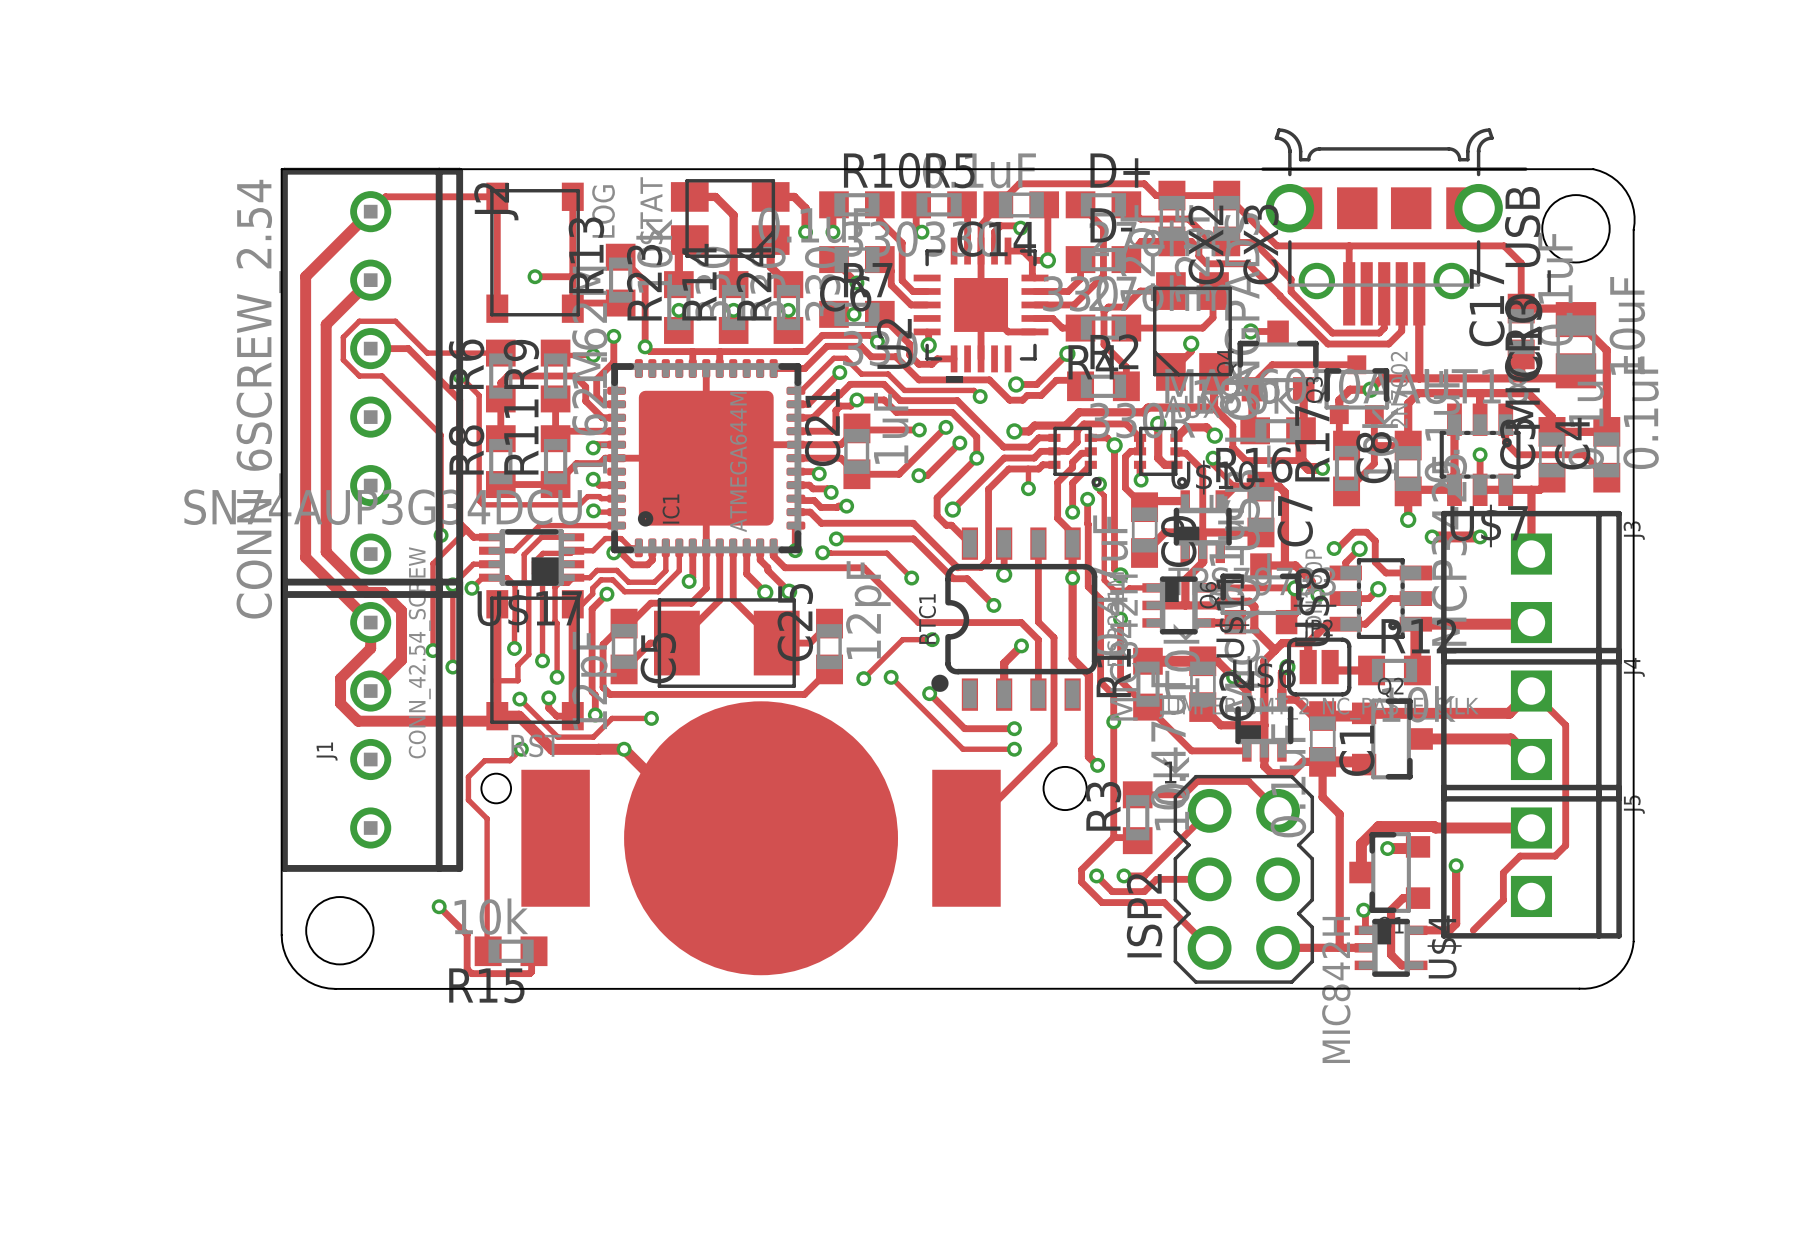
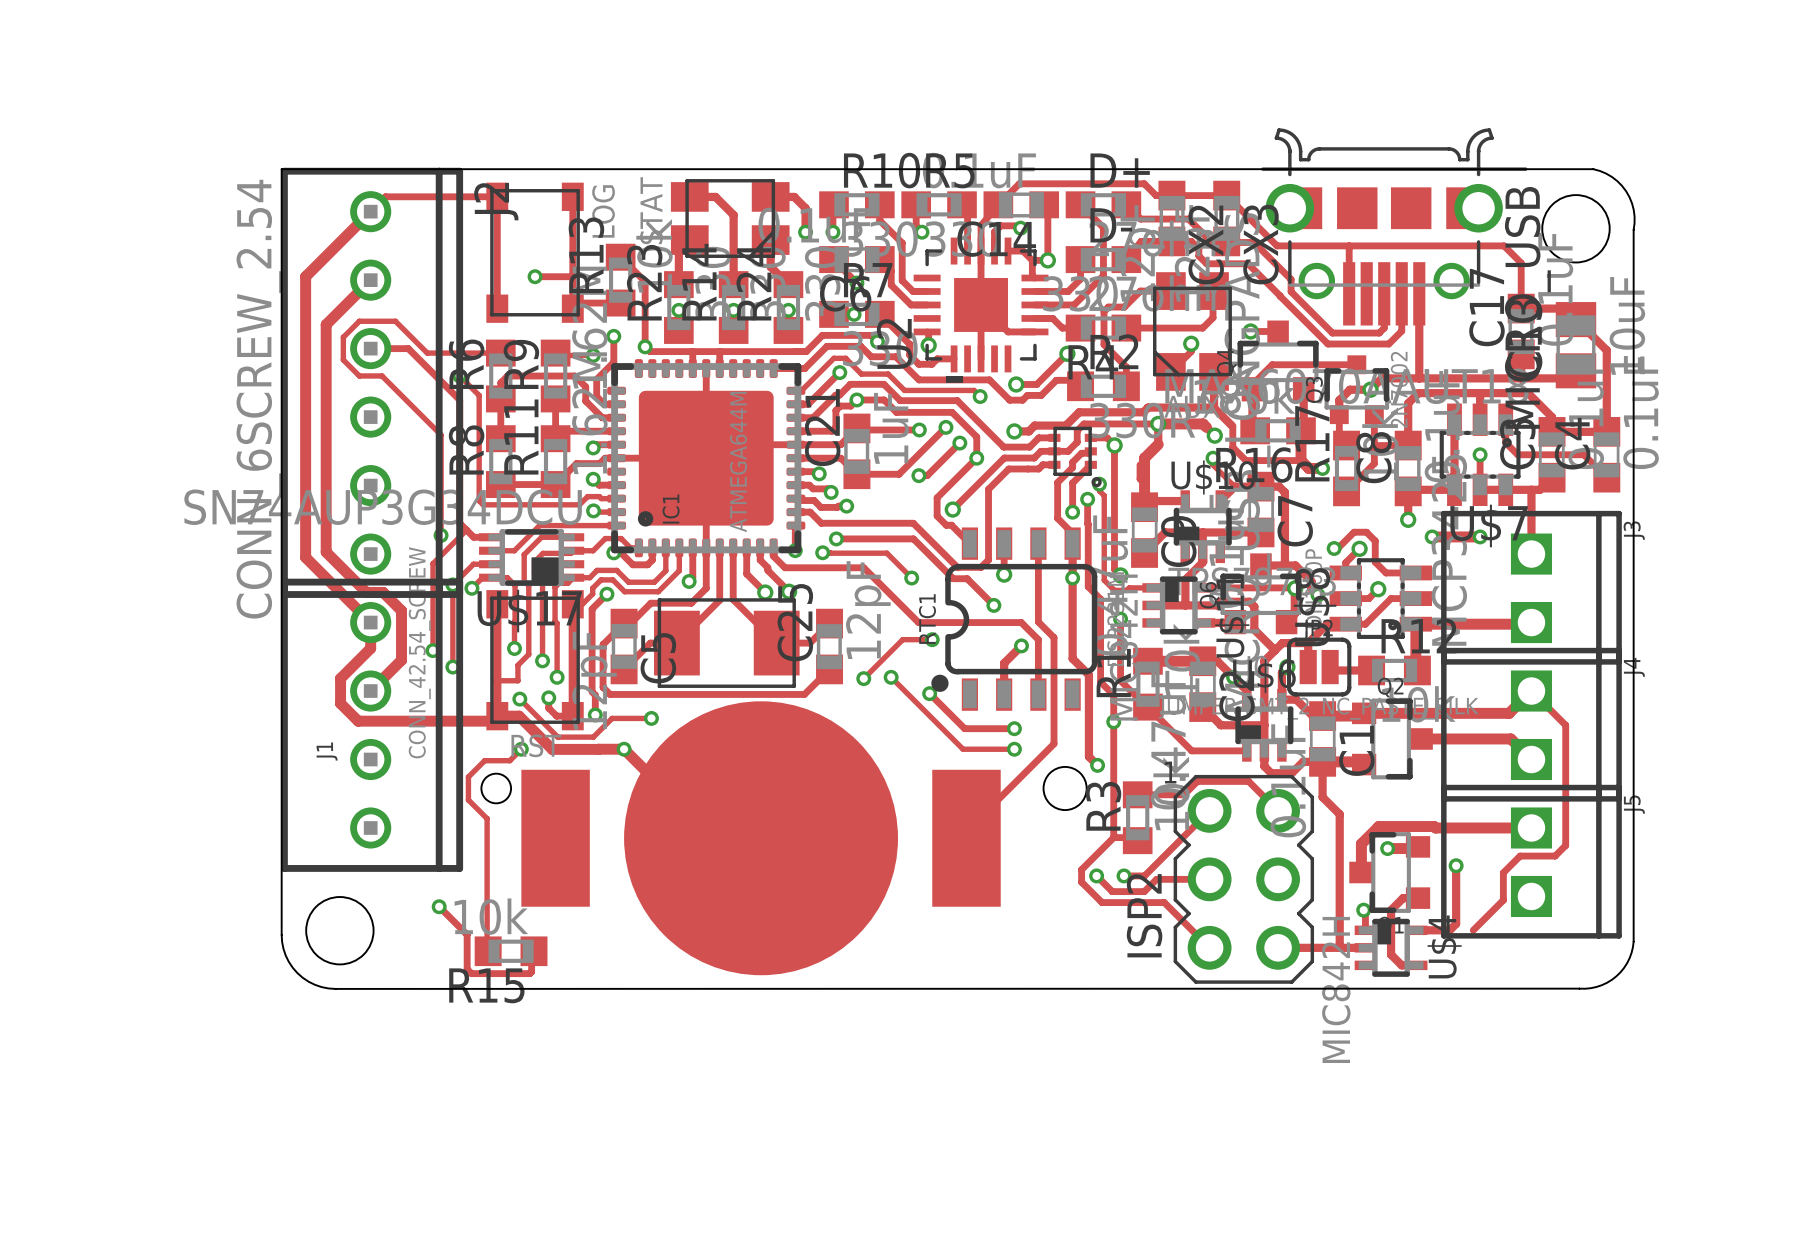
track: (1126, 423) (1140, 437) (1140, 451) (1130, 451) (1125, 456) (1125, 488) (1144, 507) -> (1158, 444) (1144, 458) (1144, 507)
track: (1206, 427) (1186, 427) (1176, 437) -> (1206, 427) (1203, 423) (1126, 423)
track: (1158, 444) (1158, 458) (1164, 464) (1176, 464) -> none
track: (1176, 451) (1185, 453) (1202, 470) (1202, 532) -> none
part: (1160, 457) -> none
track: (1028, 469) (1028, 488) -> none
via: (1141, 480) -> none
via: (1028, 488) -> none

